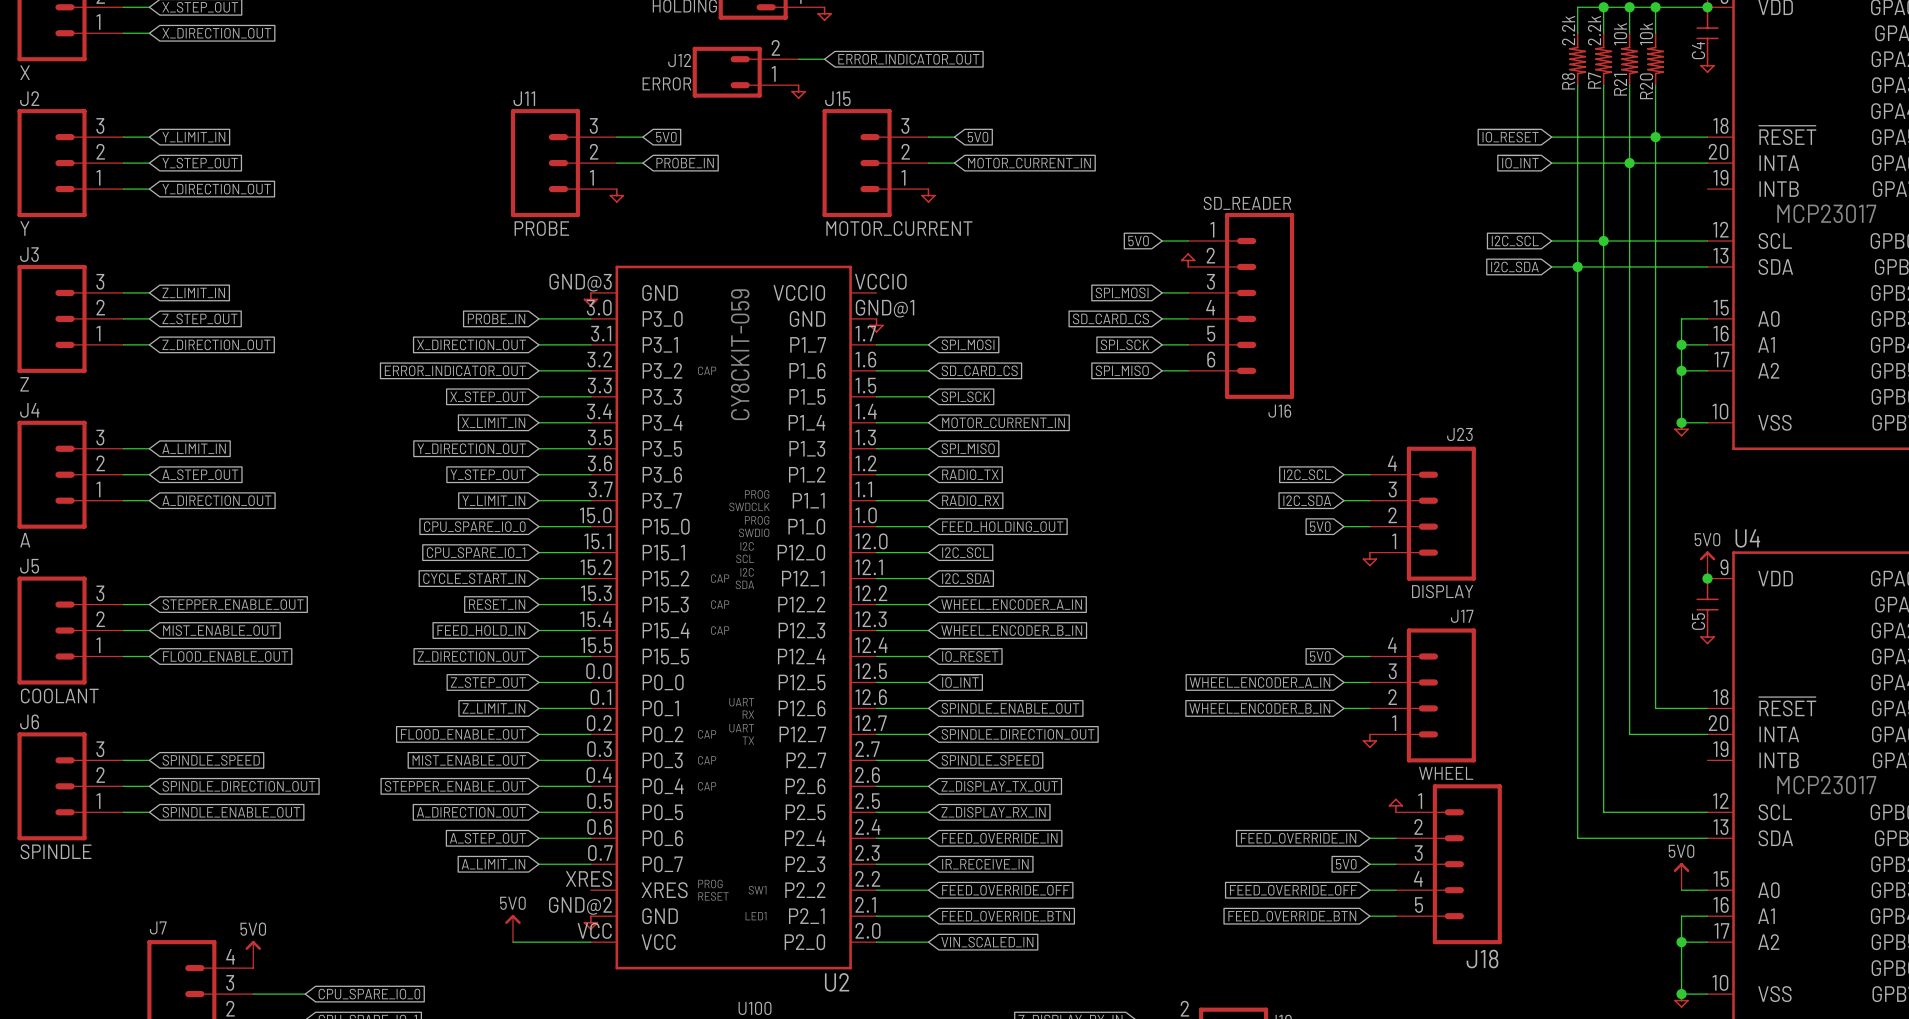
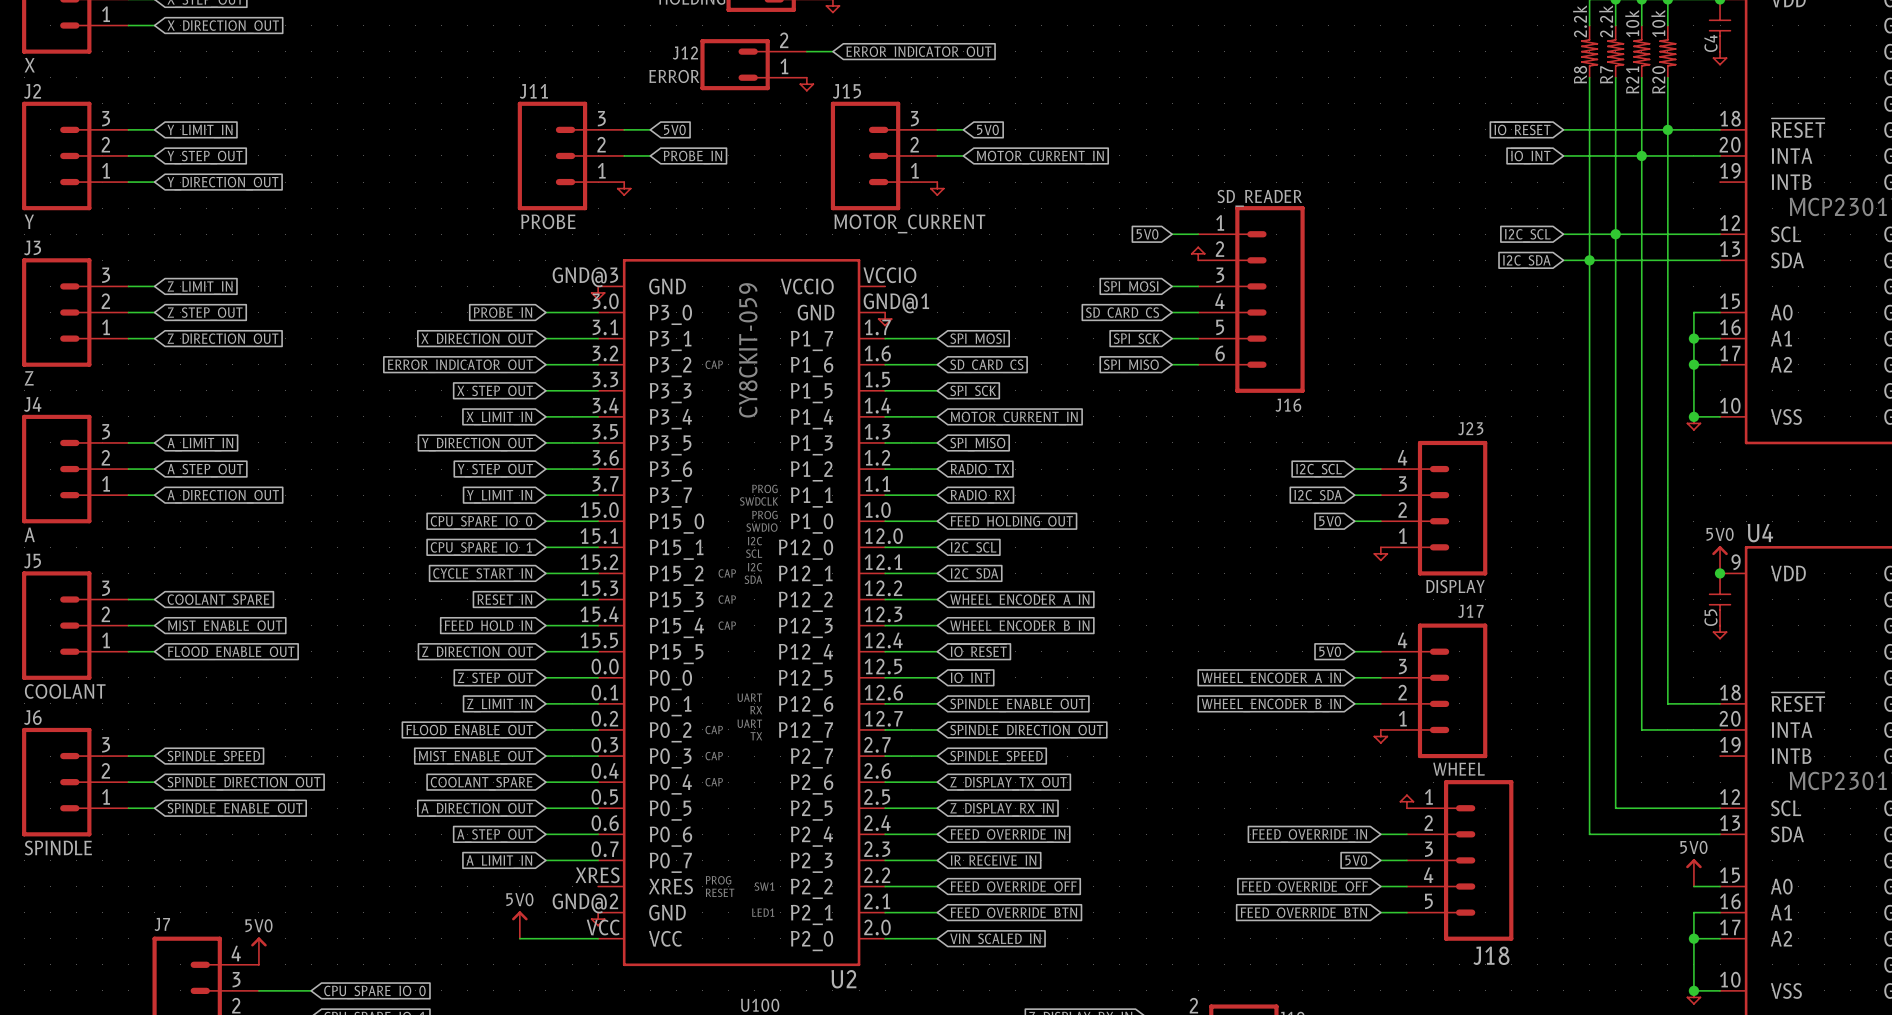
global label: STEPPER_ENABLE_OUT (233, 604) -> COOLANT_SPARE (218, 601)
global label: STEPPER_ENABLE_OUT (455, 786) -> COOLANT_SPARE (481, 783)

